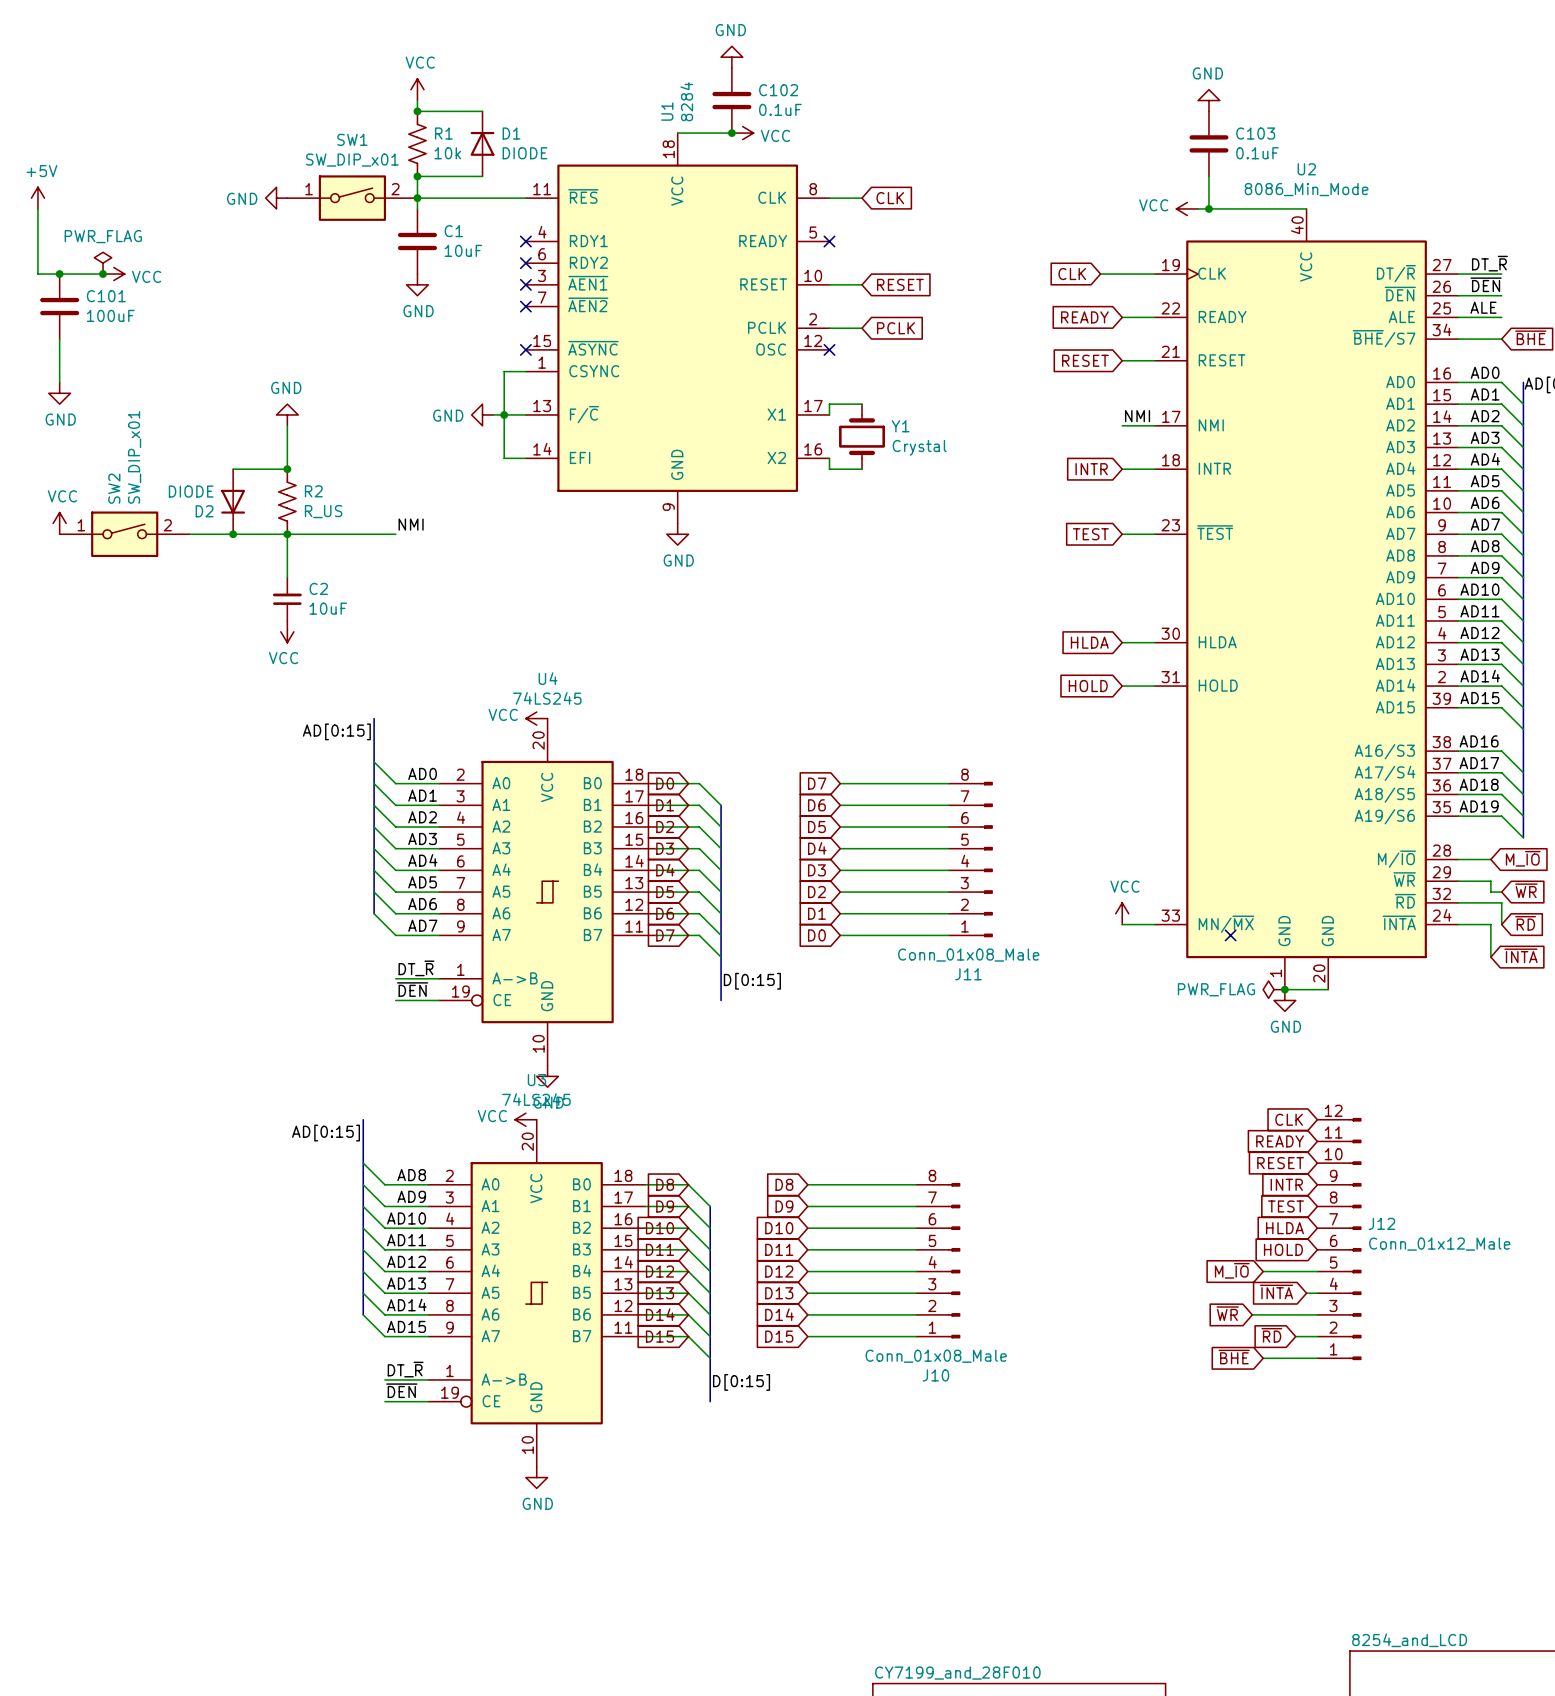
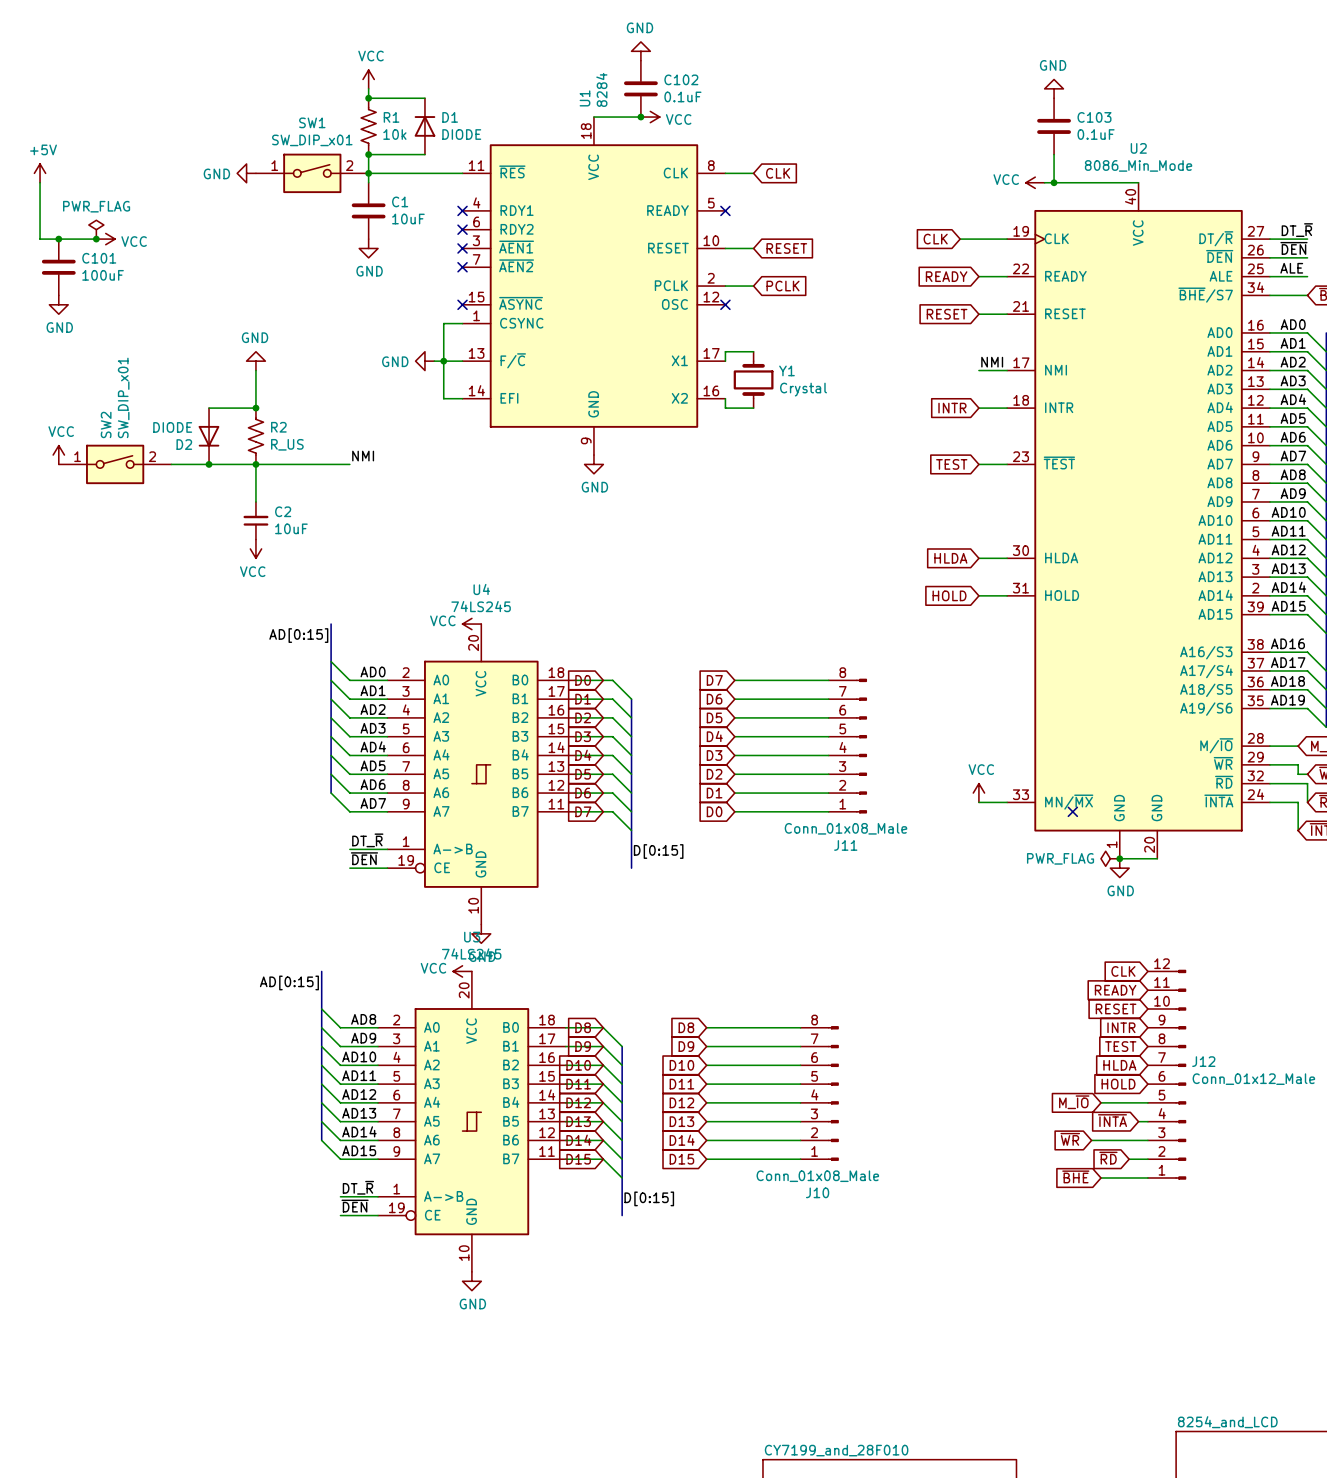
wire: (59, 339) (59, 382) -> none
power symbol position: GND (59, 393) -> GND (58, 304)

